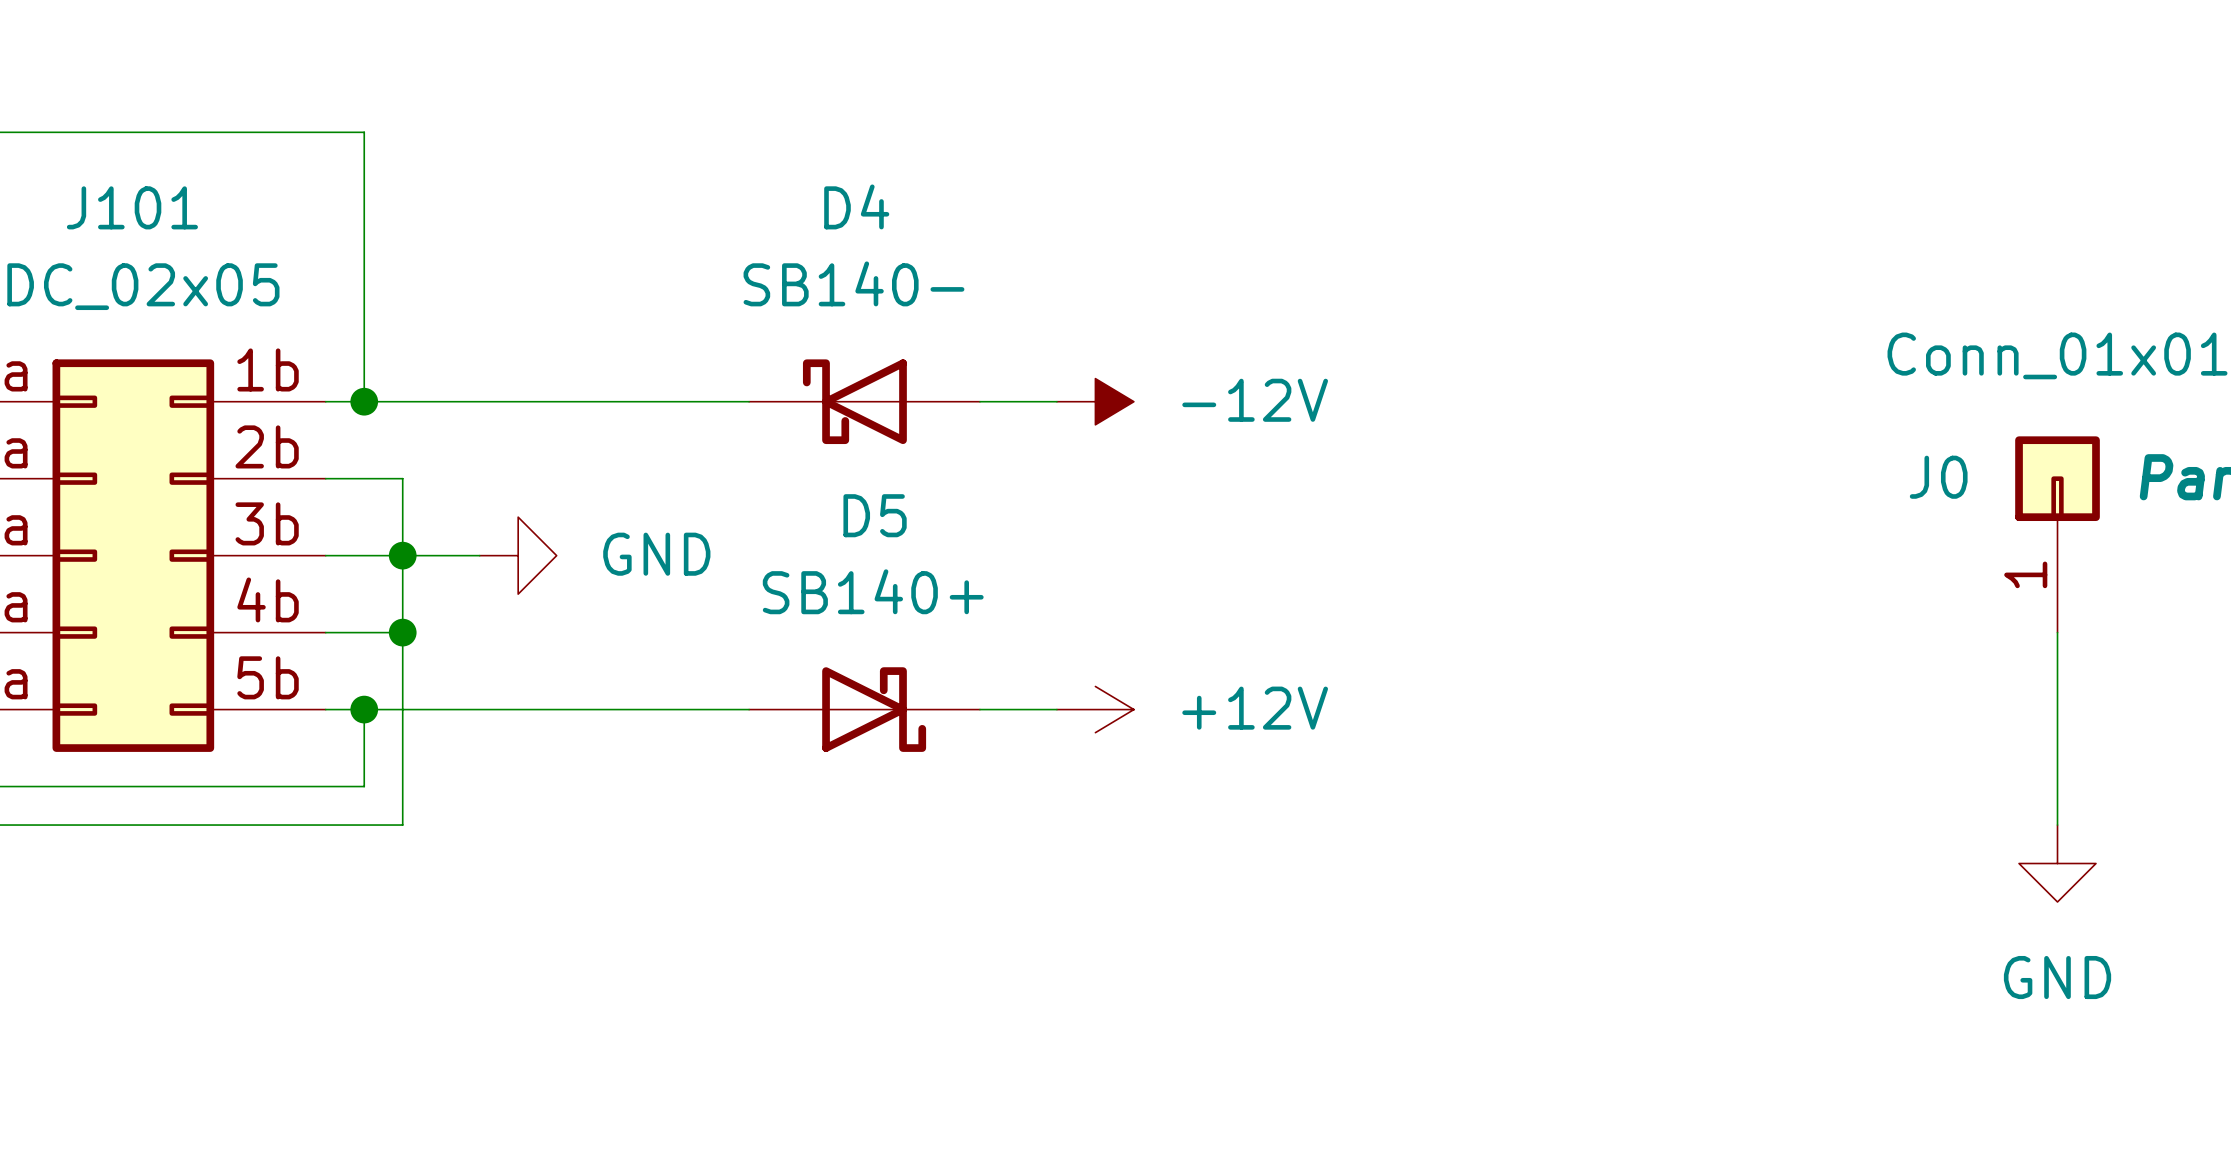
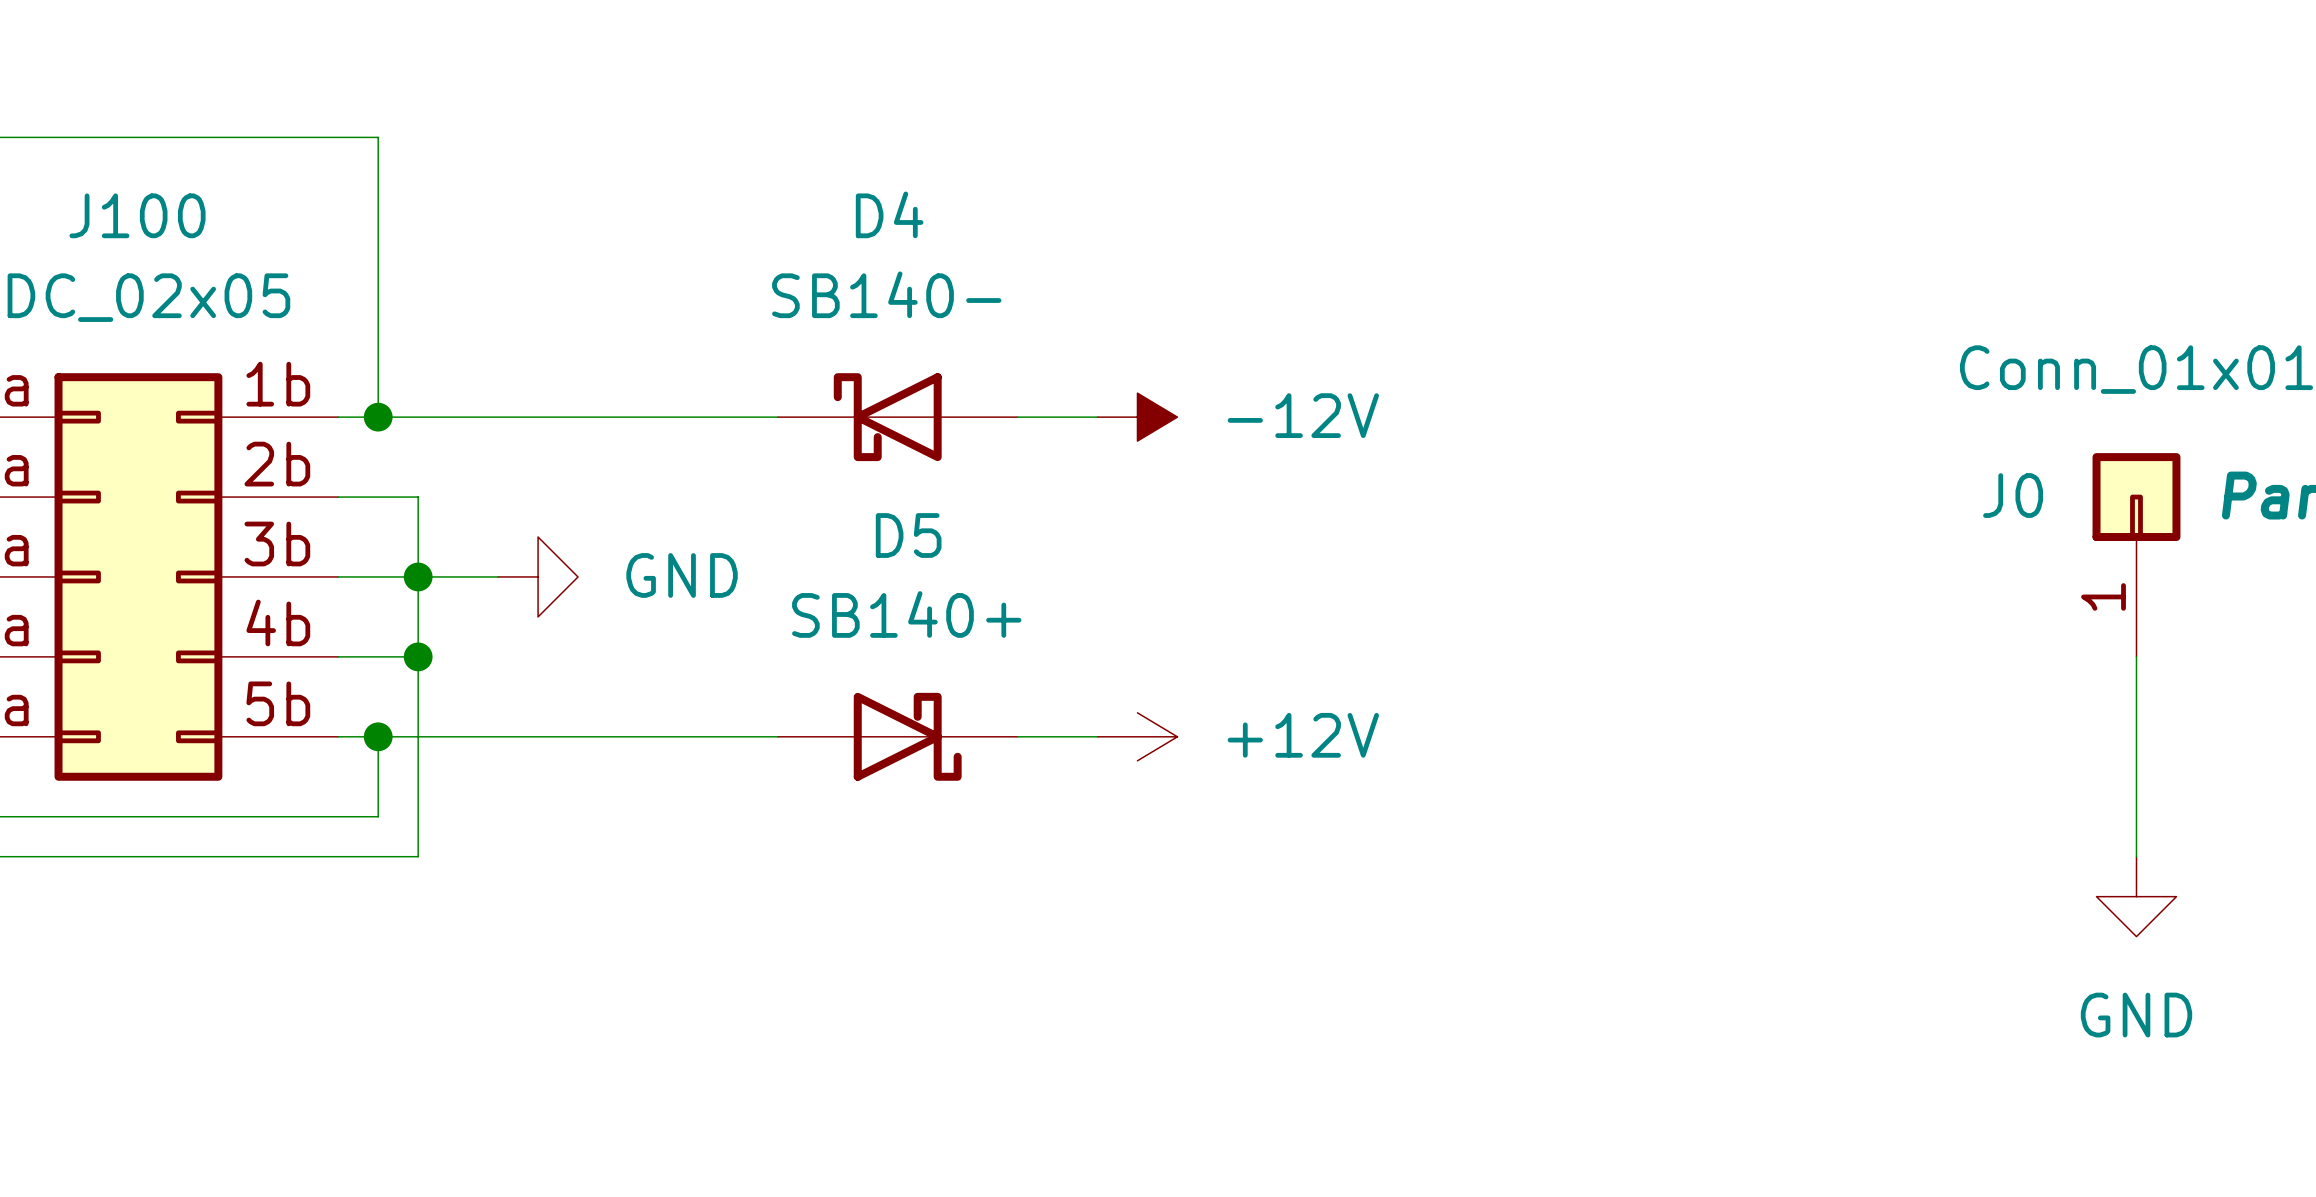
J101 name: J101 (132, 207) -> J100 (137, 215)

